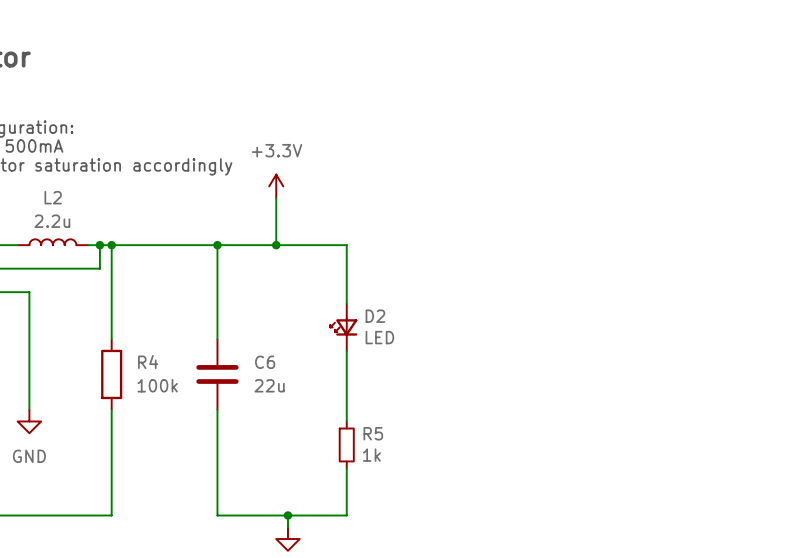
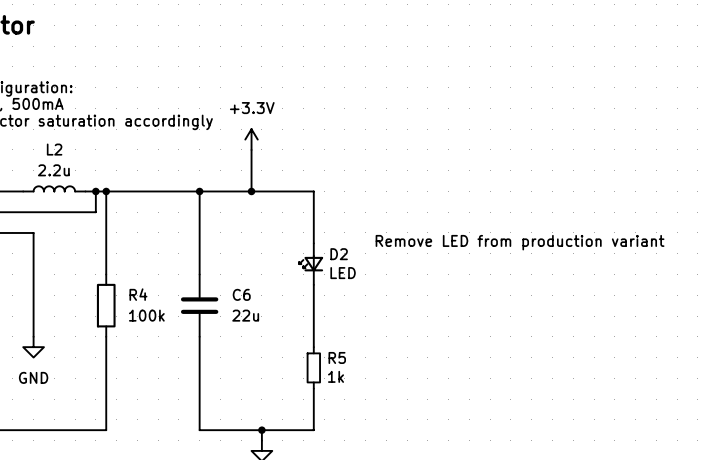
text: none -> Remove LED from production variant (520, 242)

